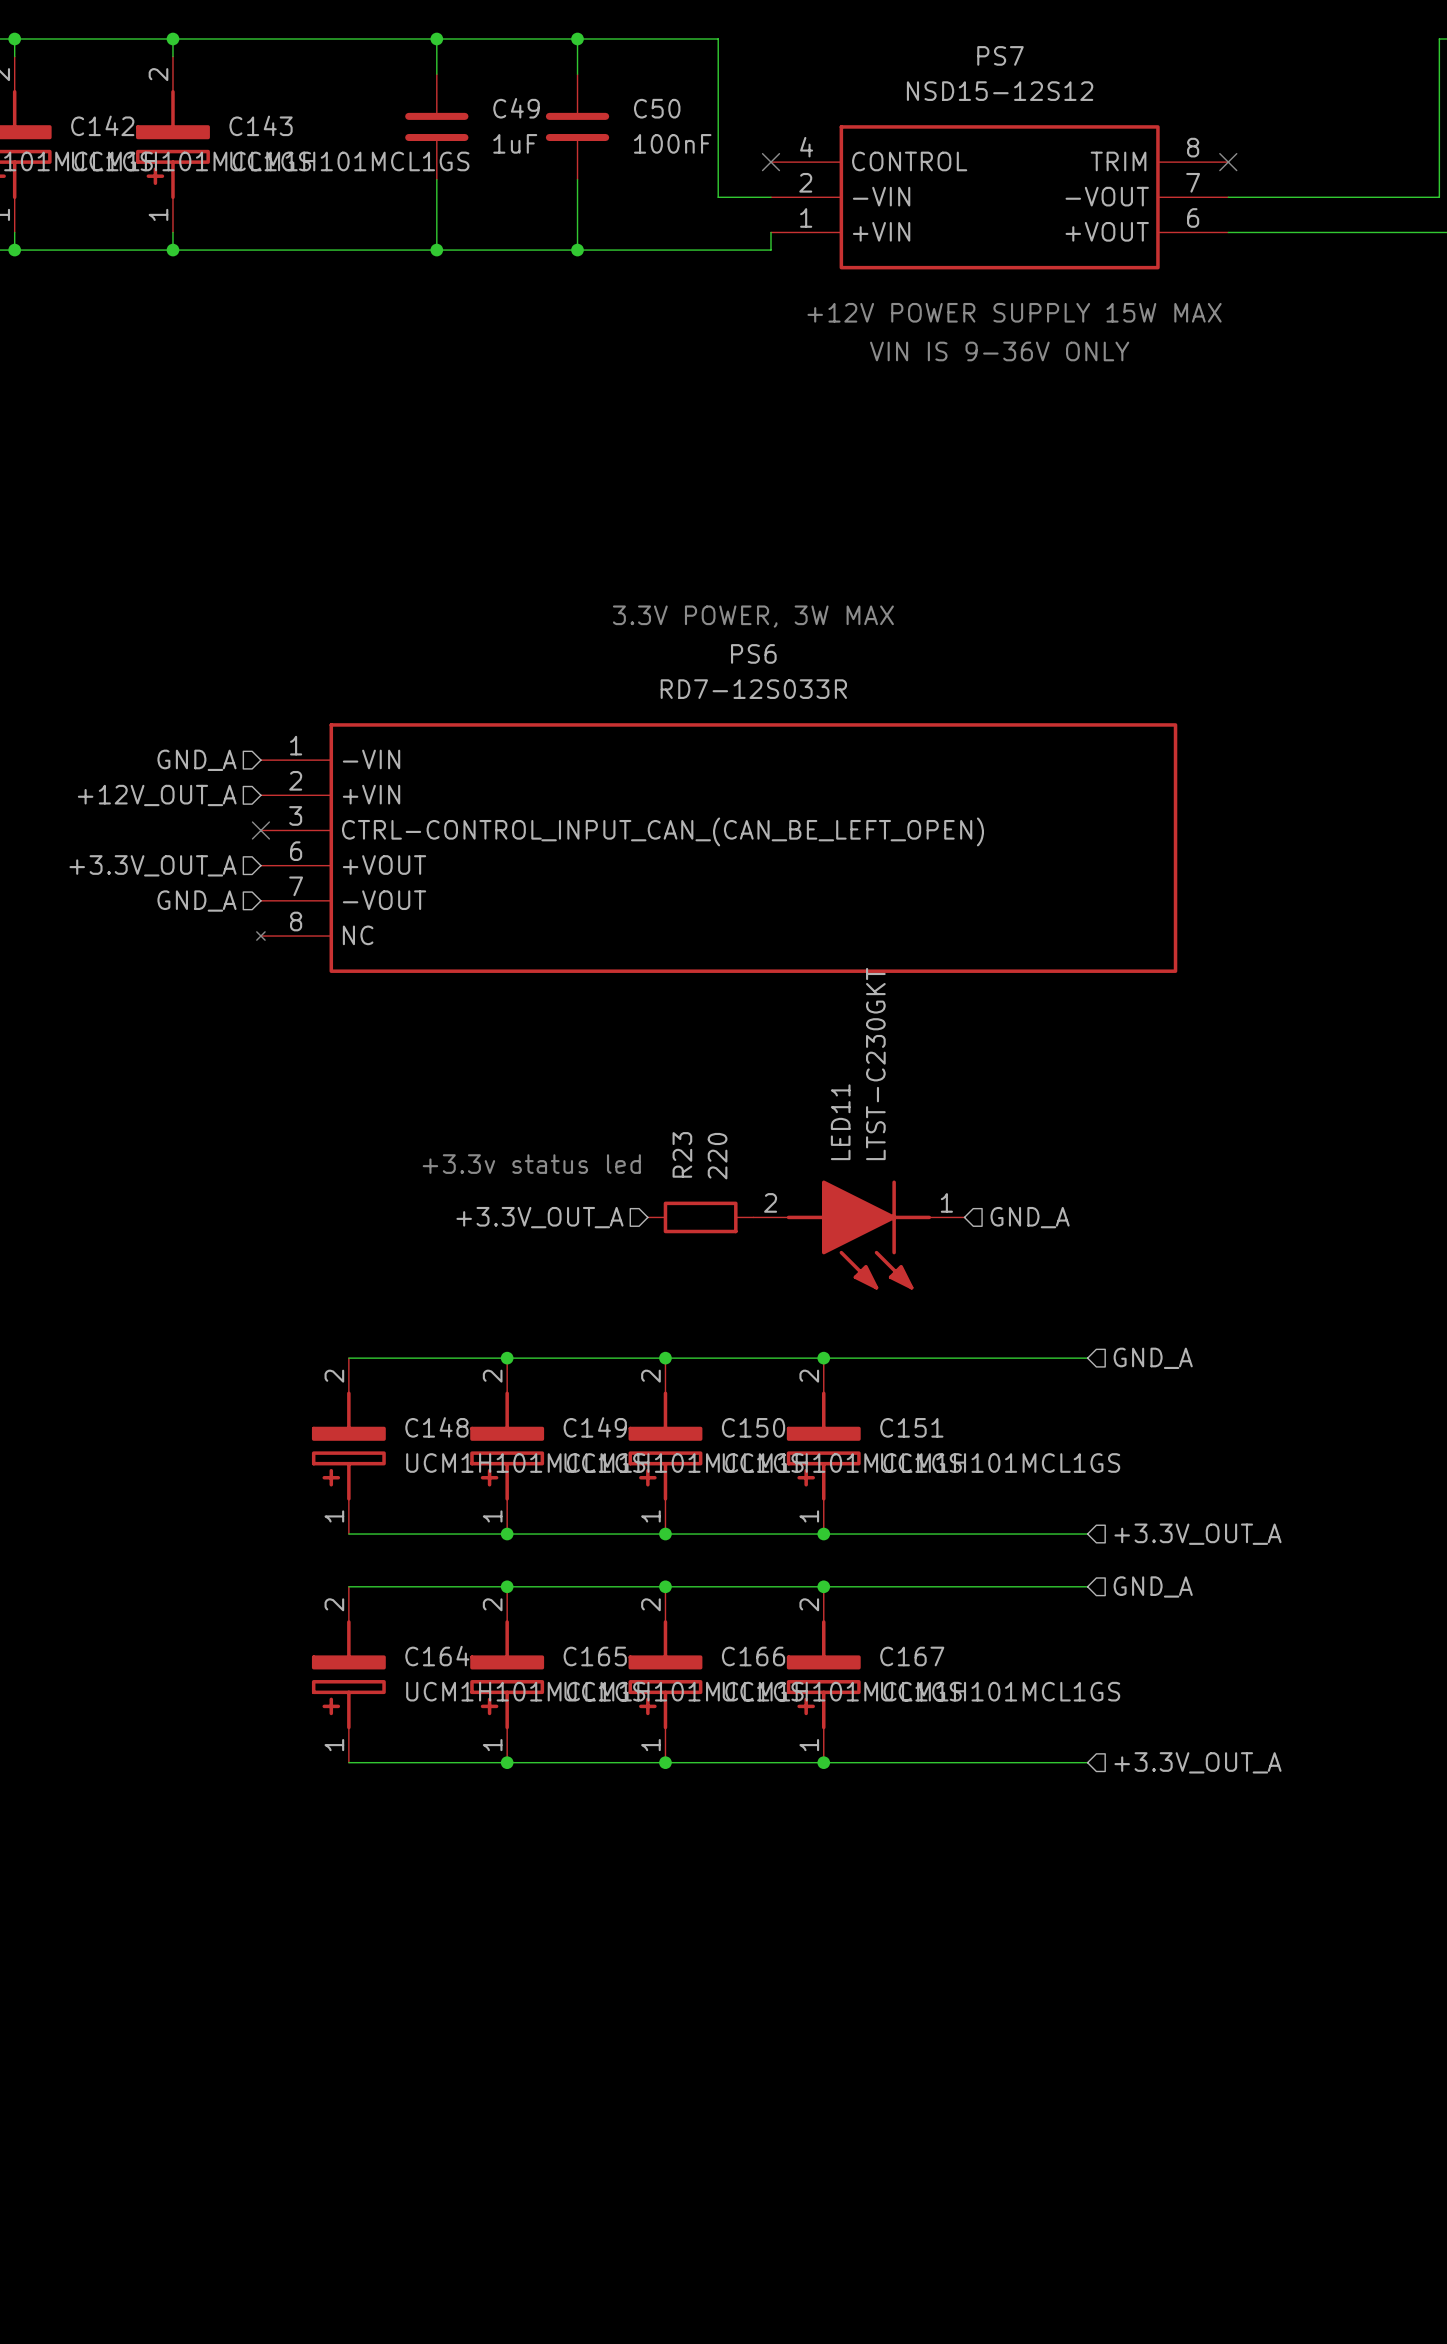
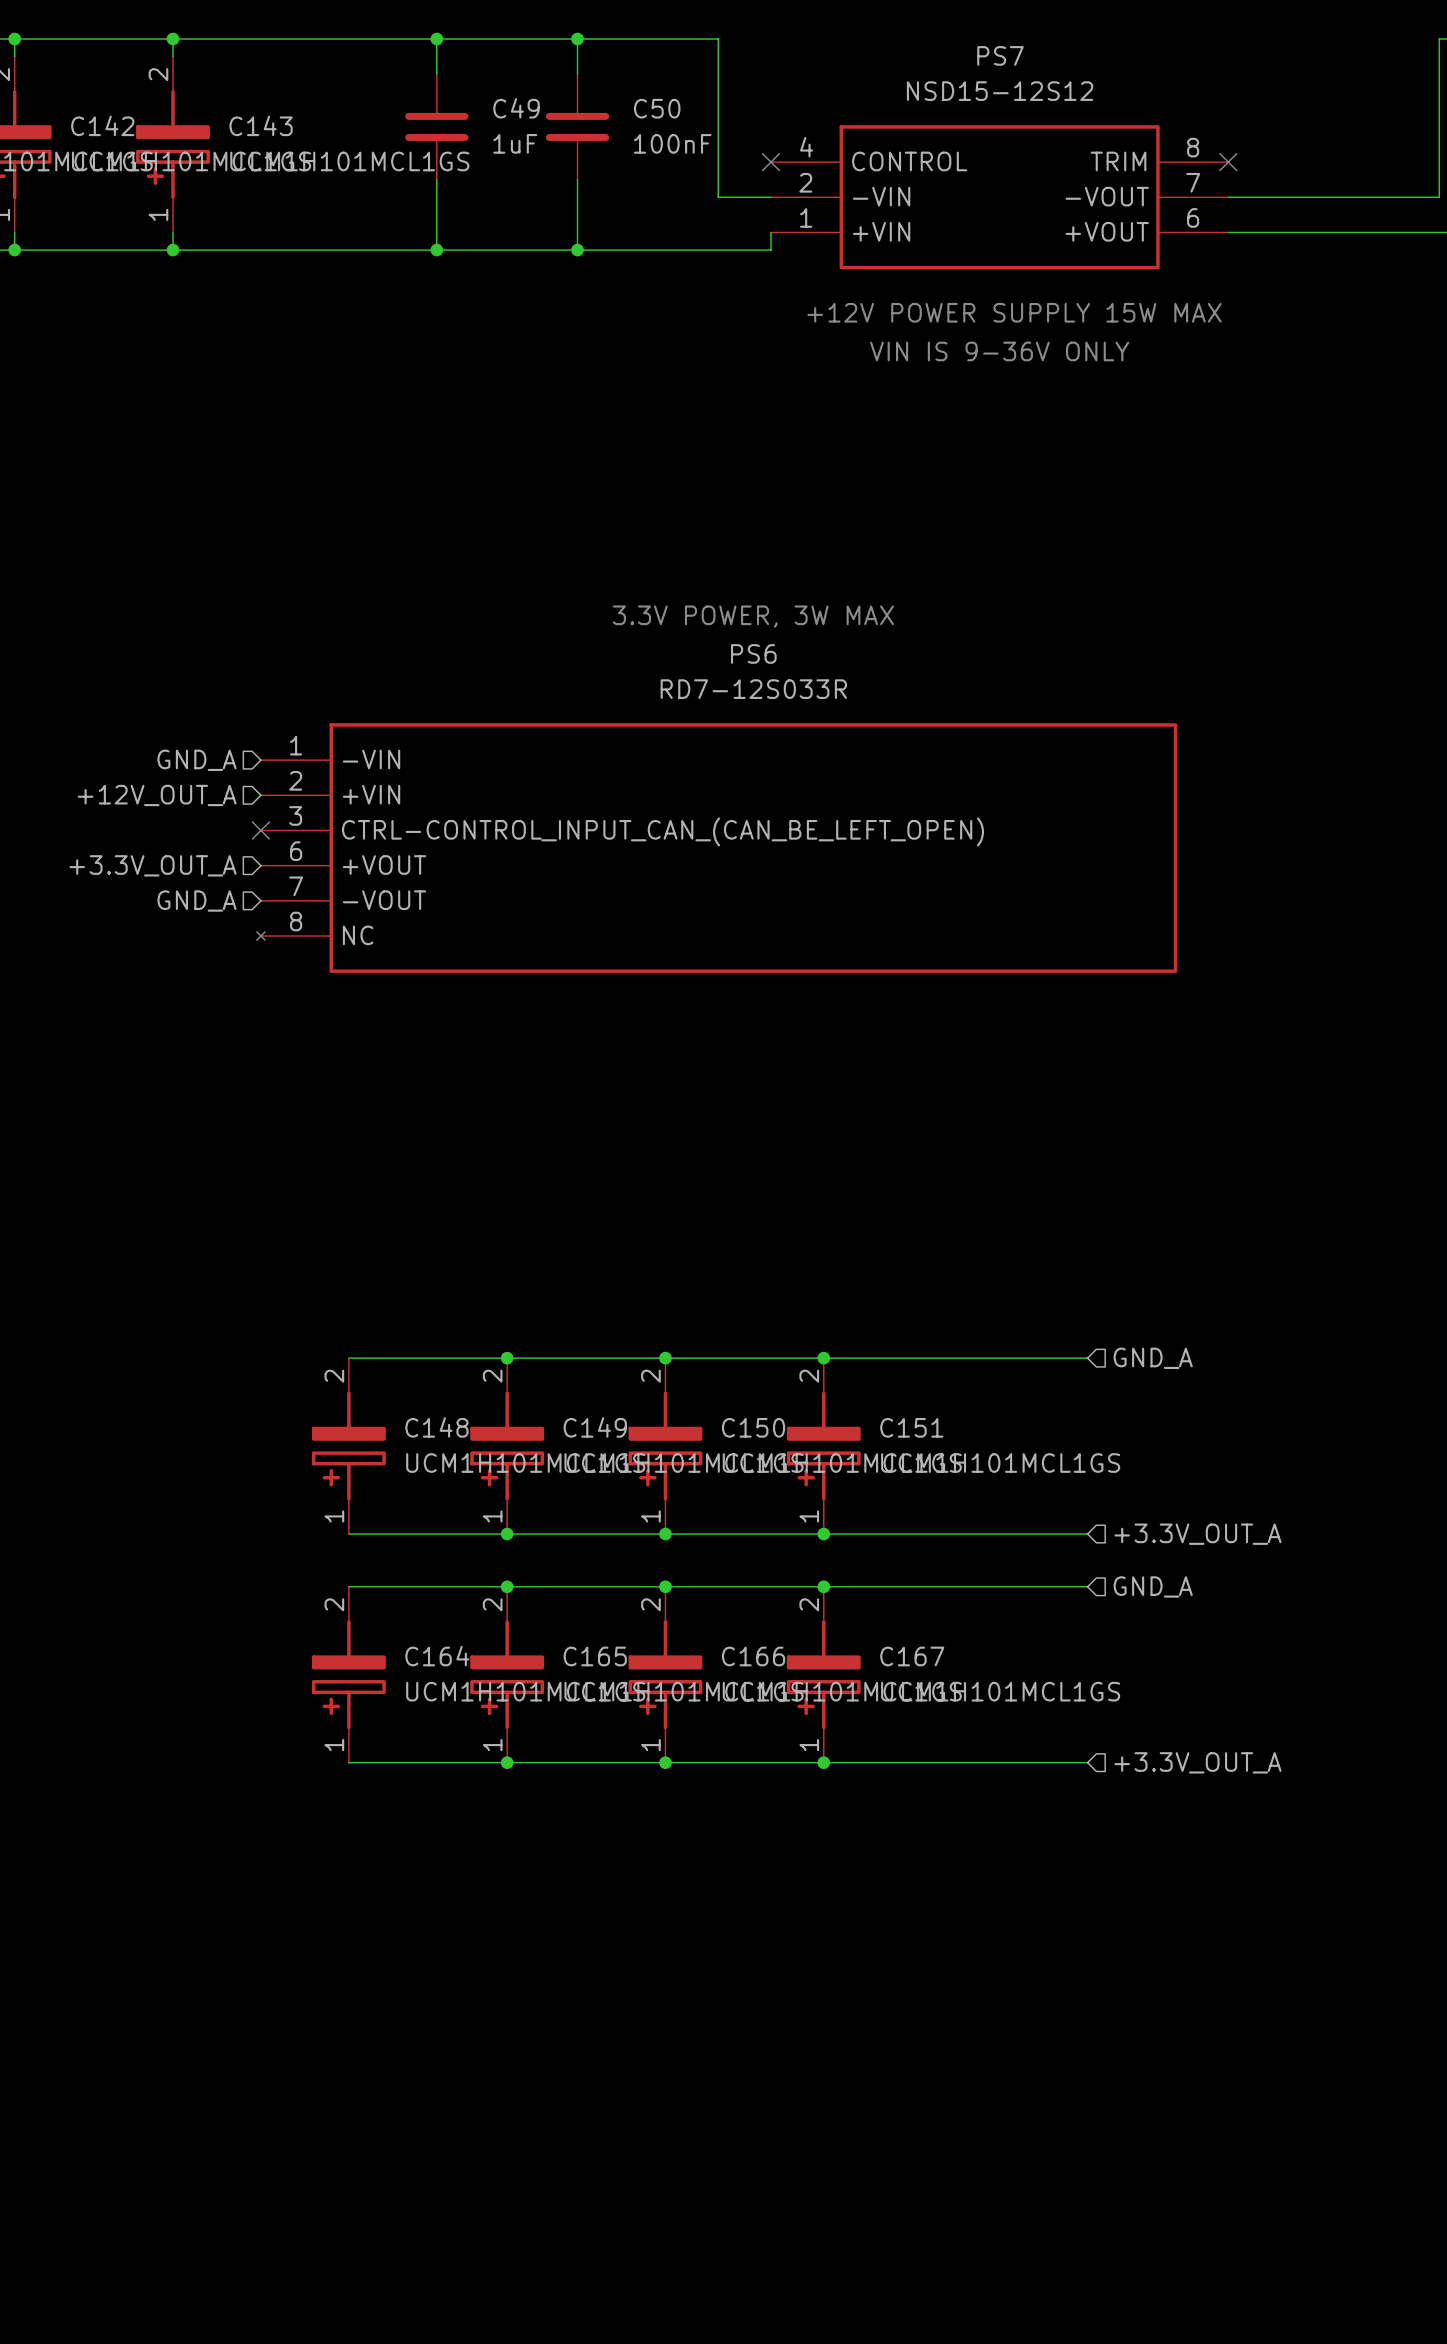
text: +3.3v status led (531, 1164) -> none
hierarchical label: +3.3V_OUT_A (539, 1217) -> none
R23: 220 (700, 1217) -> none
hierarchical label: GND_A (1030, 1217) -> none
LED11: LTST-C230GKT (858, 1235) -> none

